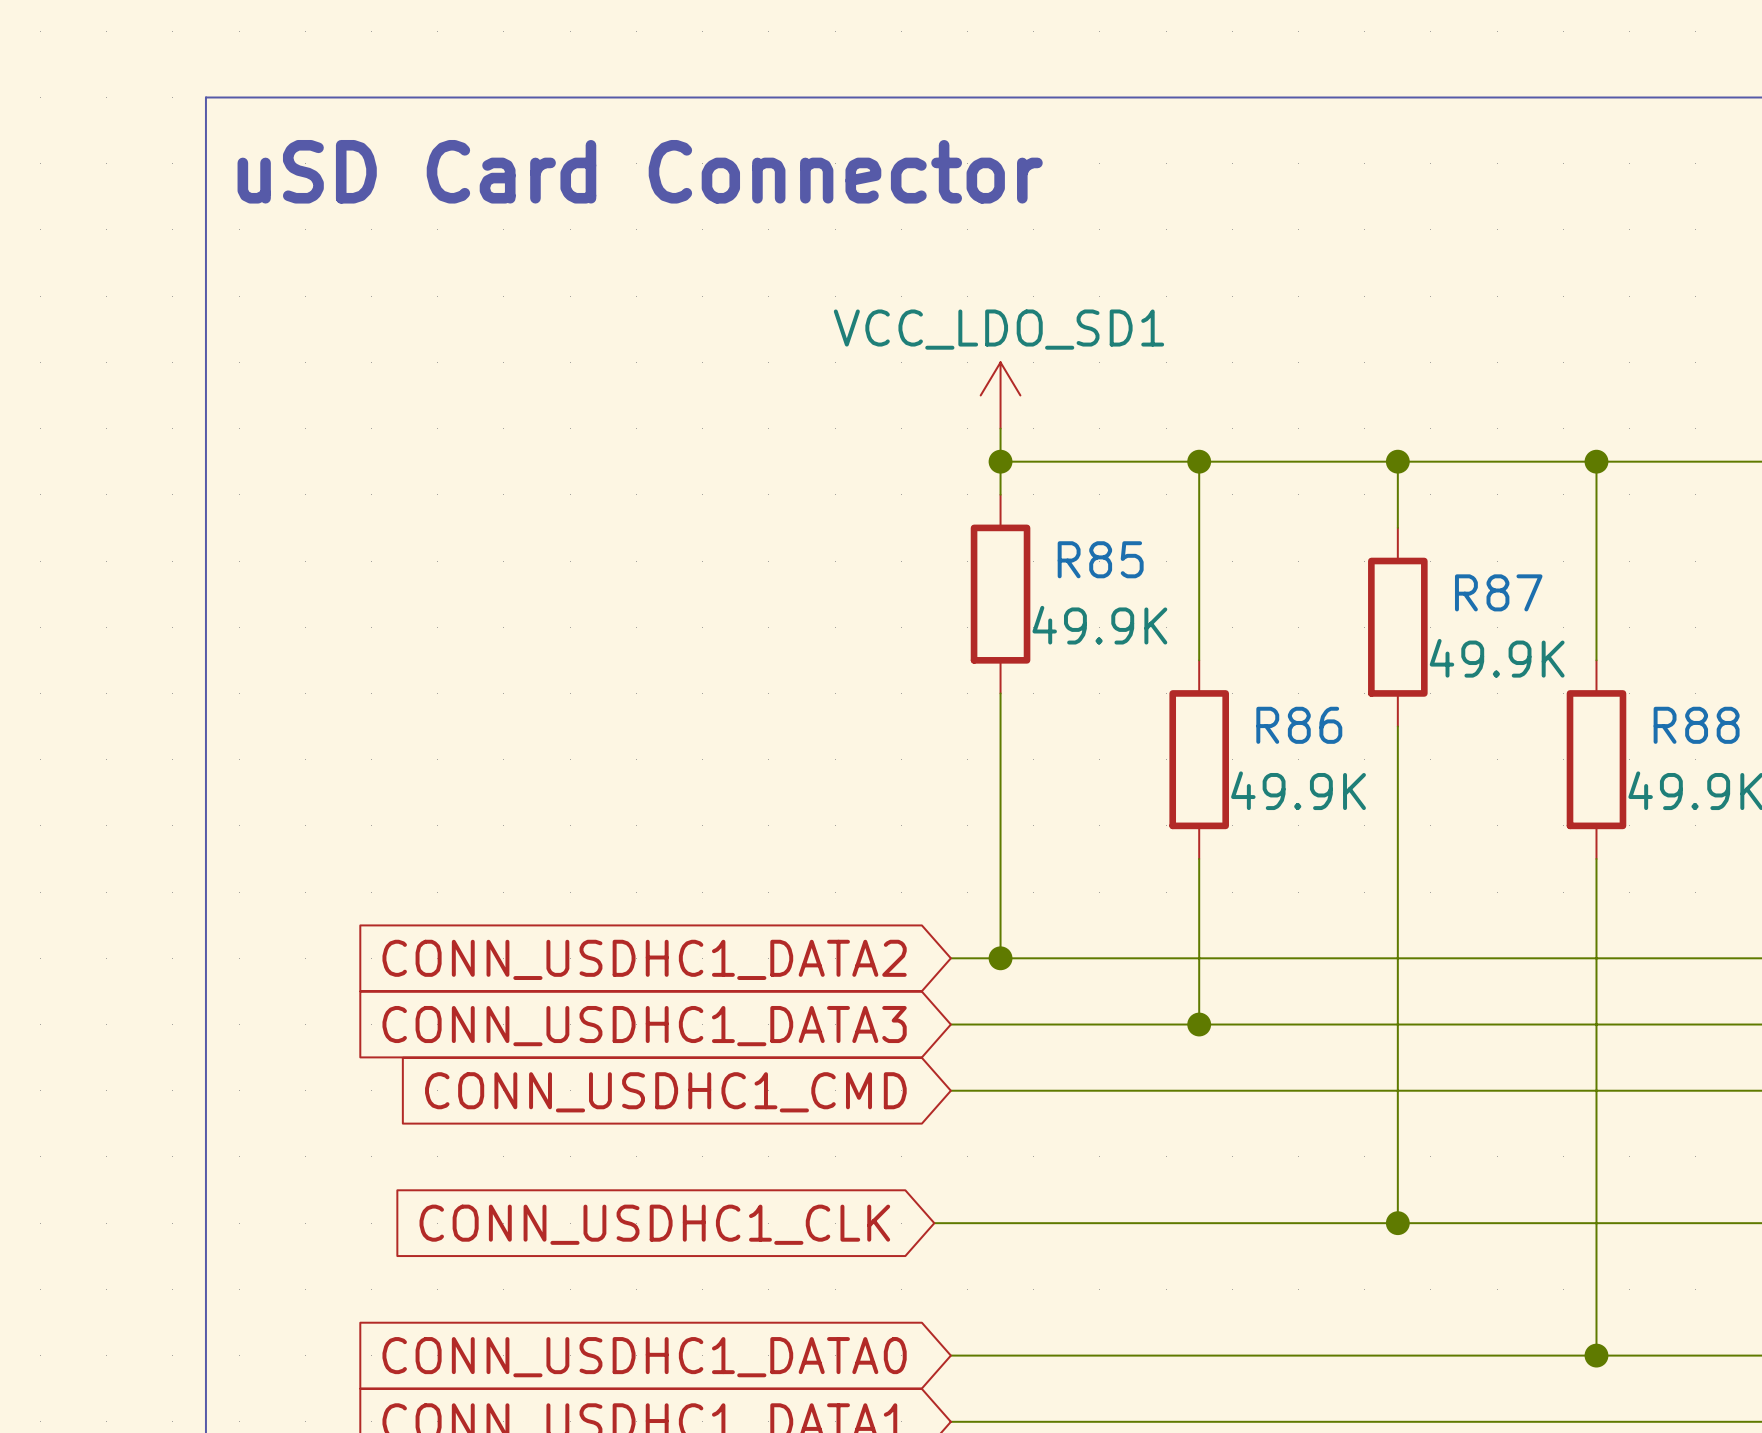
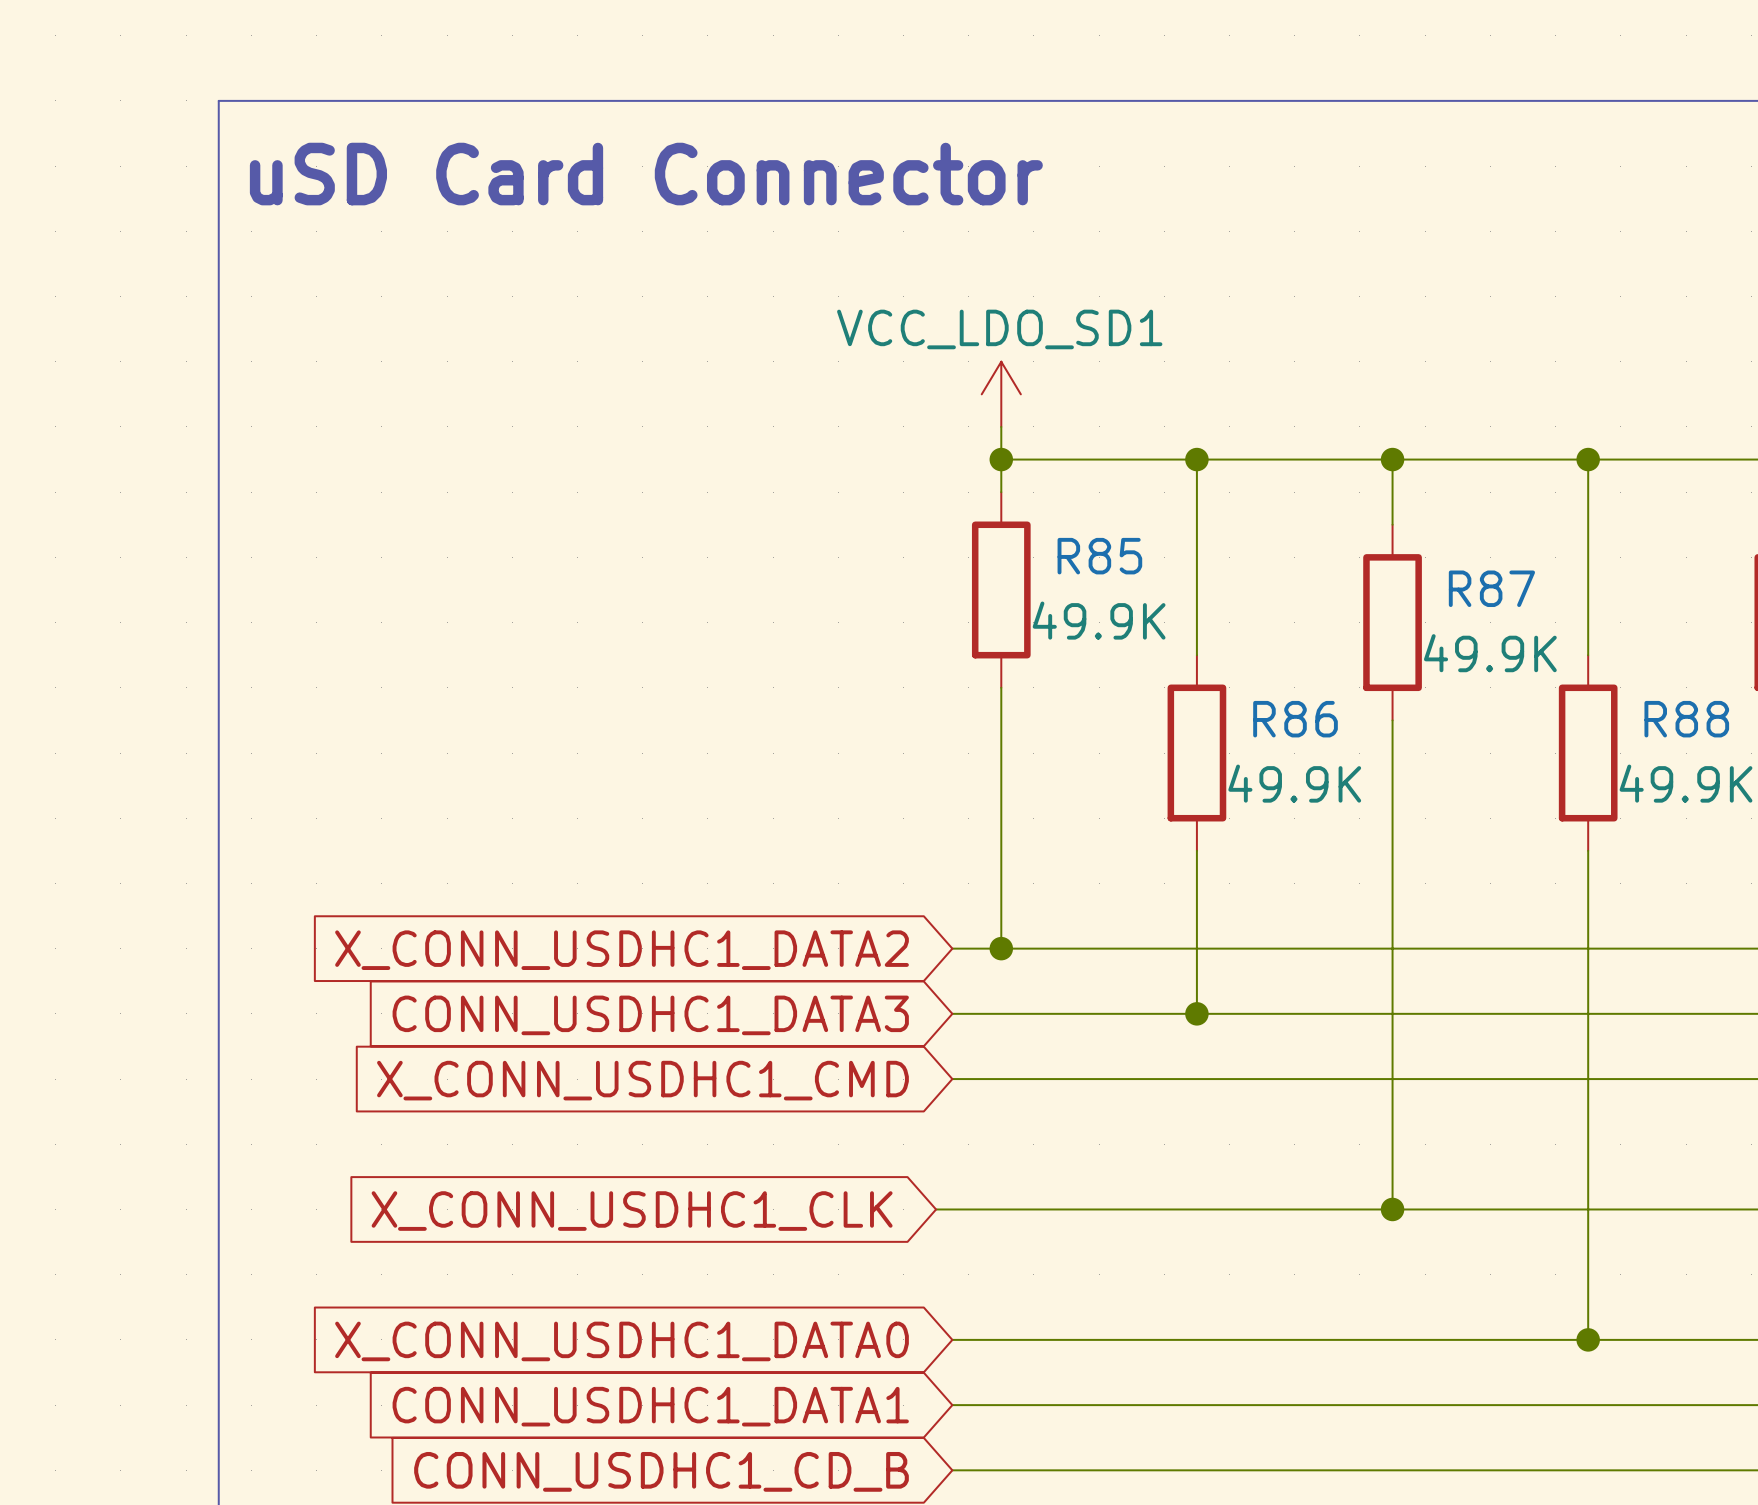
global label: CONN_USDHC1_DATA2 (644, 959) -> X_CONN_USDHC1_DATA2 (622, 950)
global label: CONN_USDHC1_CMD (665, 1092) -> X_CONN_USDHC1_CMD (642, 1080)
global label: CONN_USDHC1_CLK (654, 1224) -> X_CONN_USDHC1_CLK (632, 1211)
global label: CONN_USDHC1_DATA0 (644, 1357) -> X_CONN_USDHC1_DATA0 (622, 1341)

